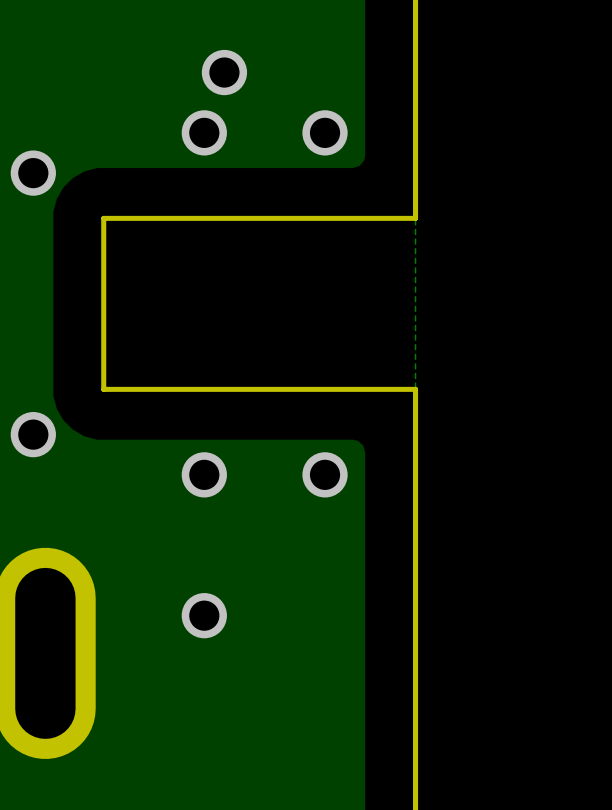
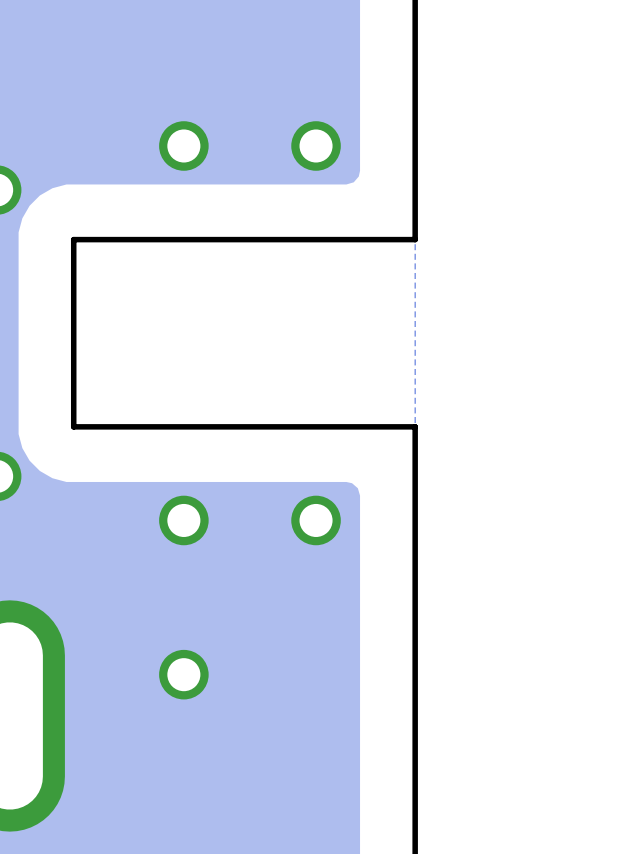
via: (224, 72) -> none

